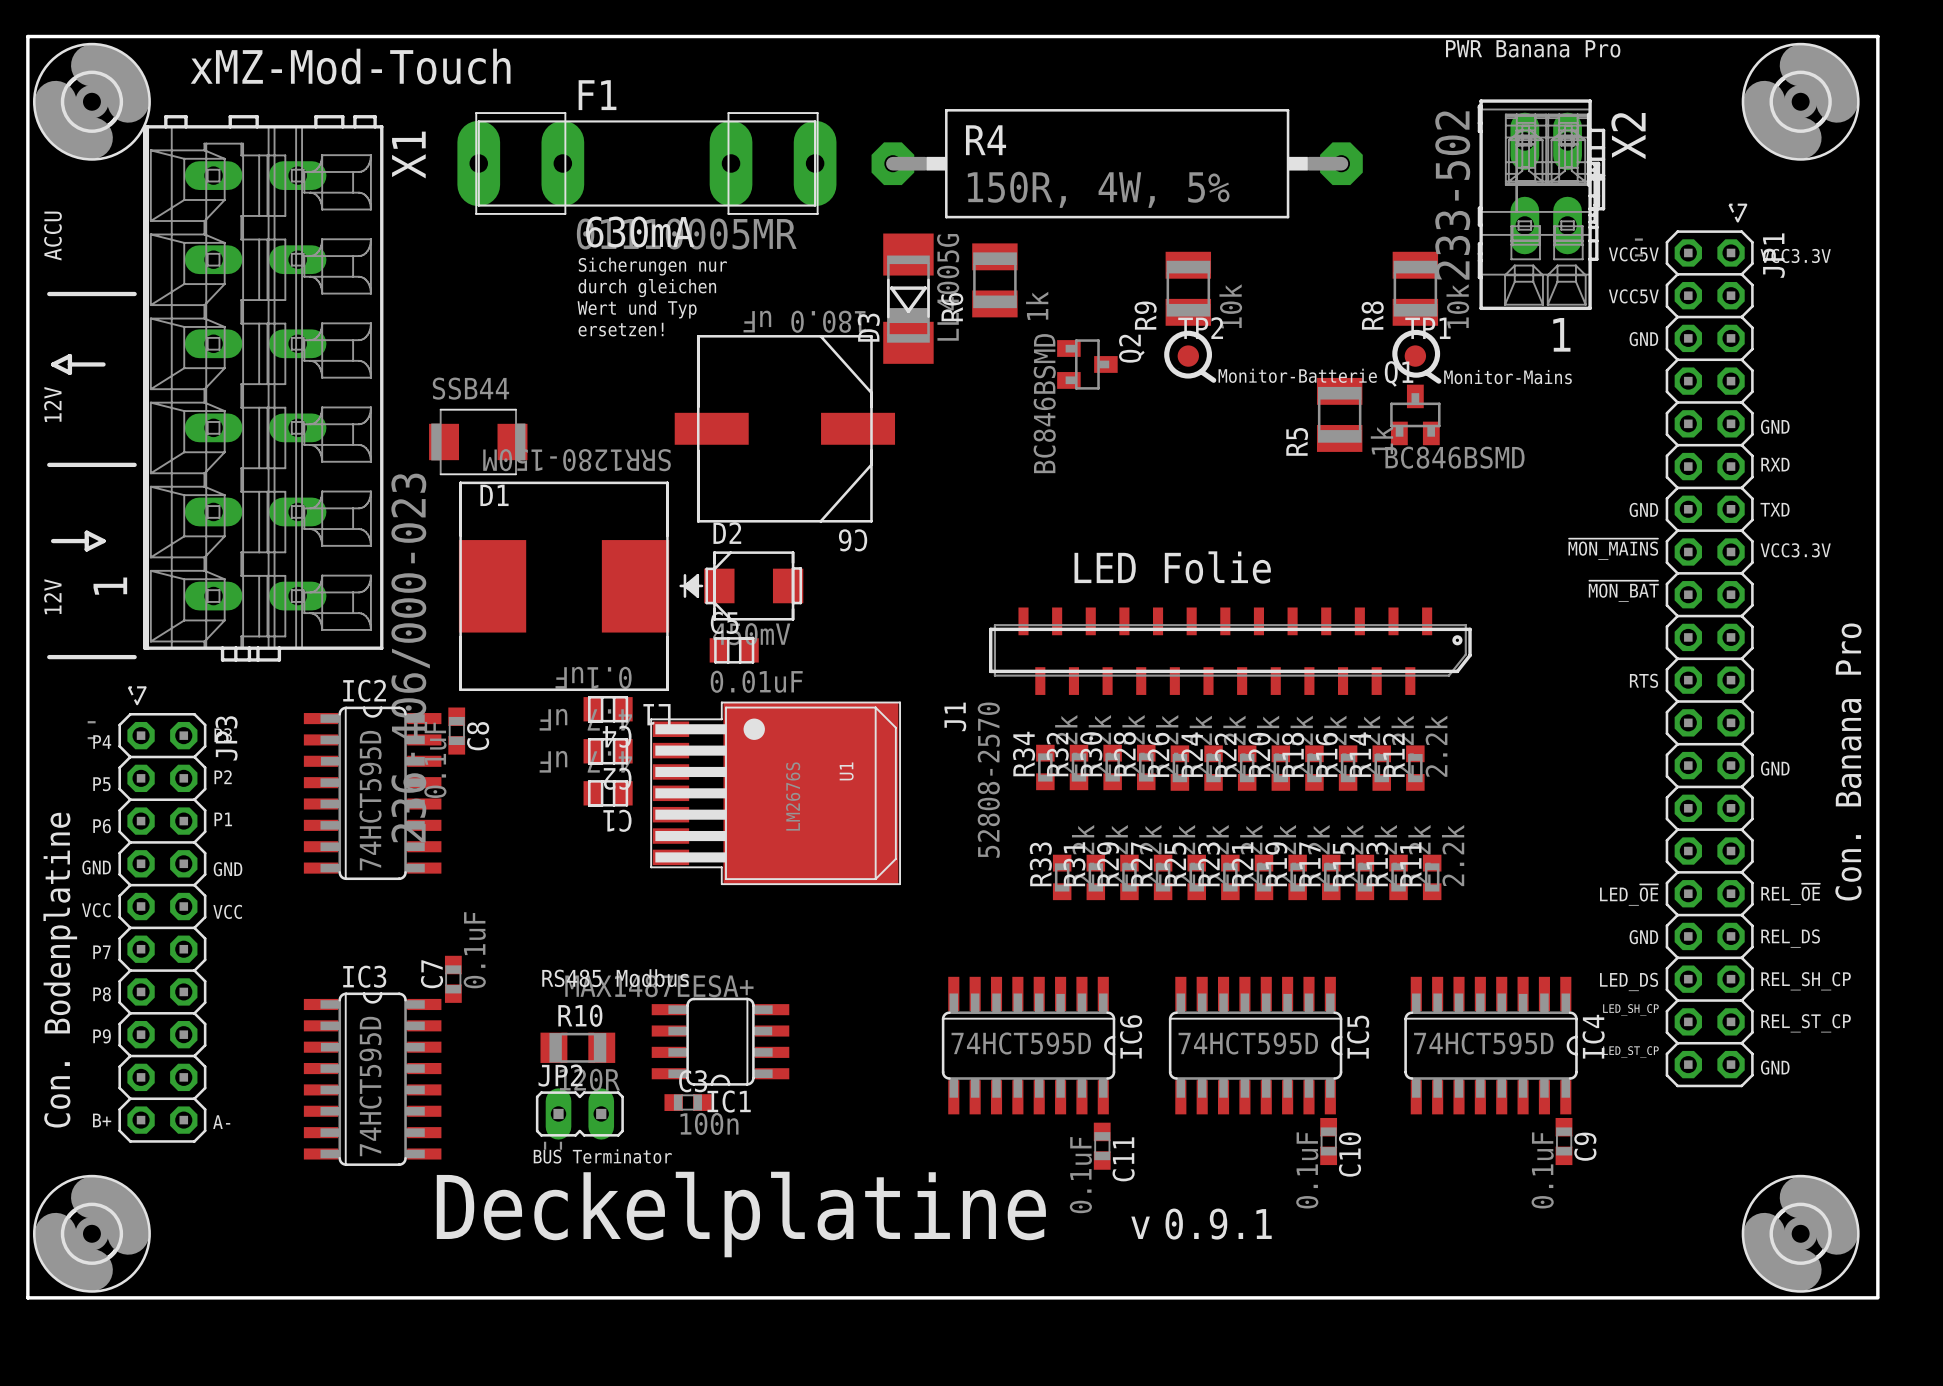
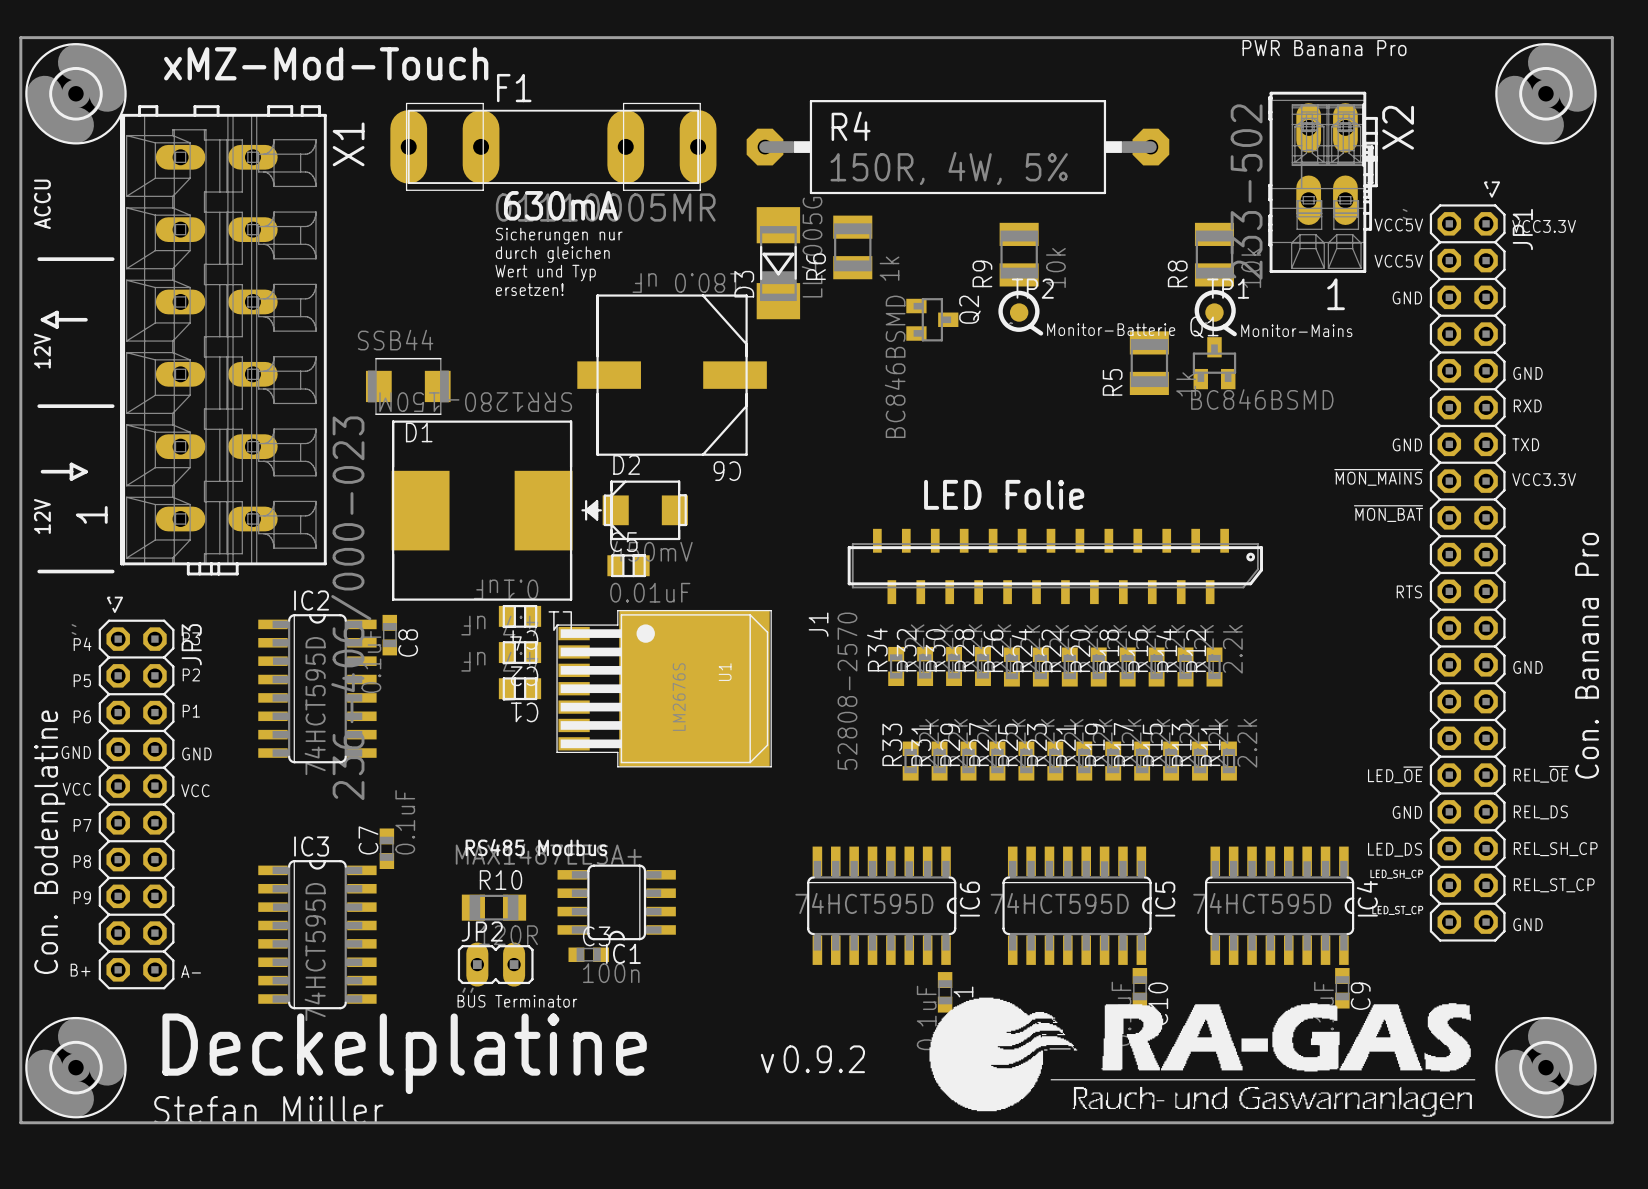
drawing: none -> [929, 997, 1476, 1117]
drawing: none -> [154, 1013, 866, 1124]
text: Deckelplatine (741, 1214) -> none
text: 0.9.1 (1218, 1224) -> none
text: v (1140, 1227) -> none

